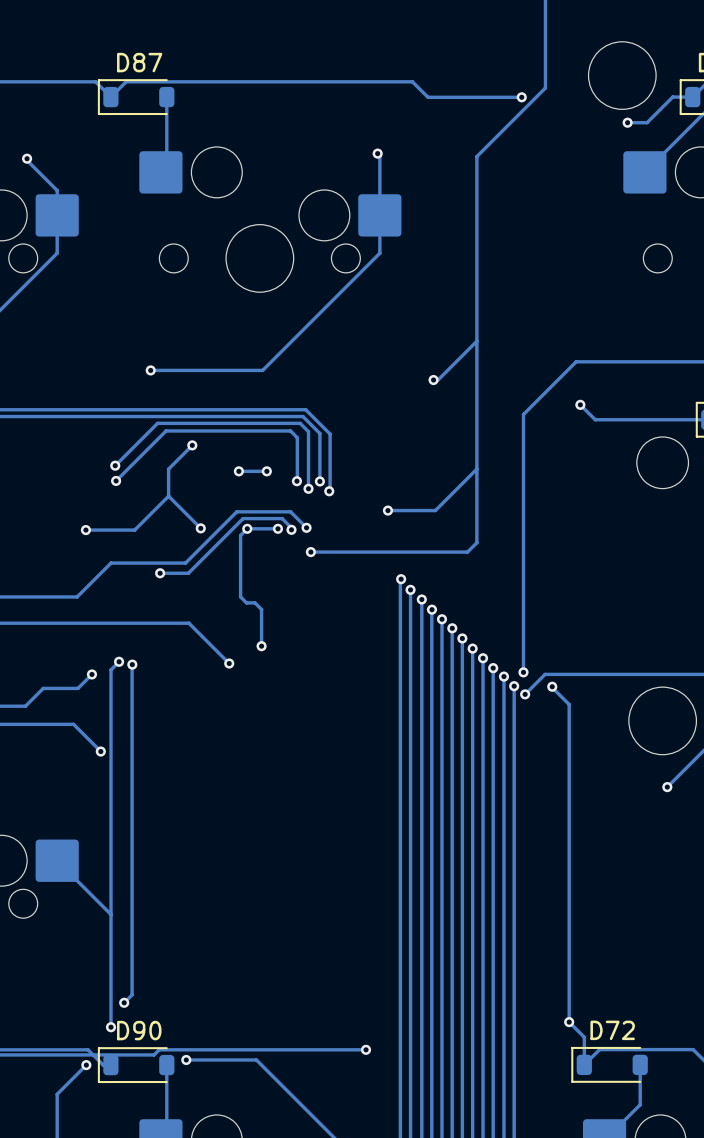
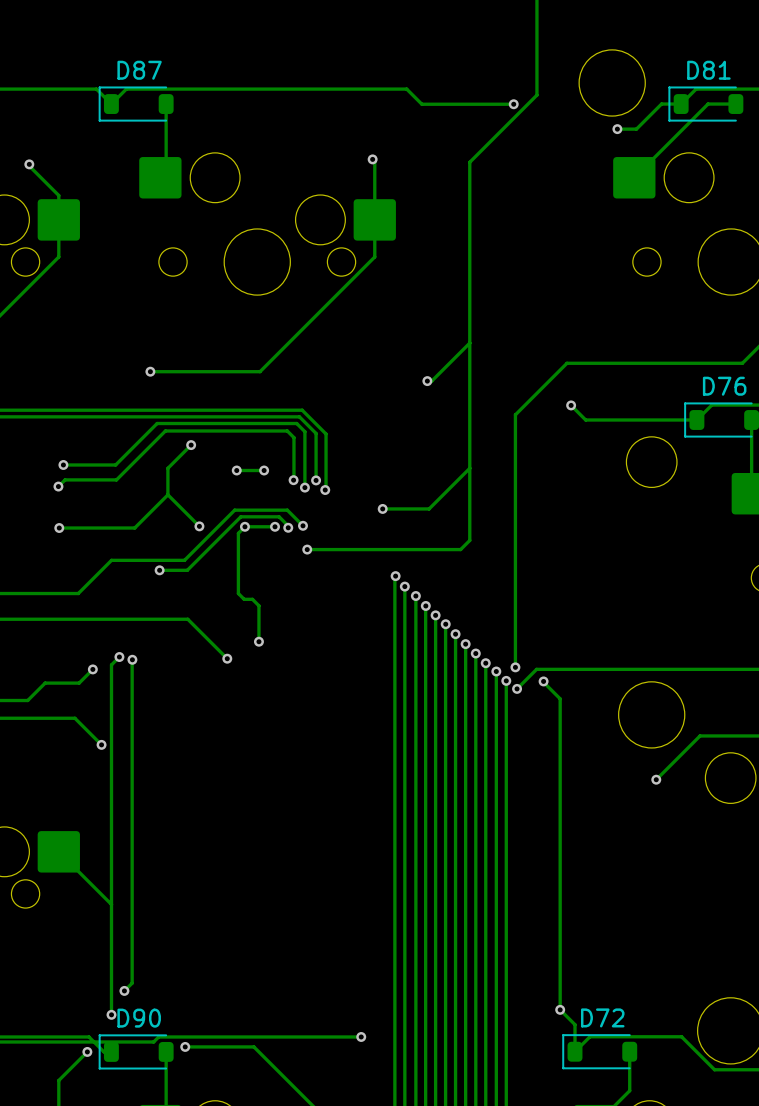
via: none -> (63, 464)
track: none -> (115, 464) (63, 464)
via: (115, 465) -> none
track: none -> (116, 479) (65, 479) (58, 486)
via: (116, 480) -> none
via: none -> (58, 486)
via: none -> (59, 528)
track: none -> (86, 528) (59, 528)
via: (85, 530) -> none

